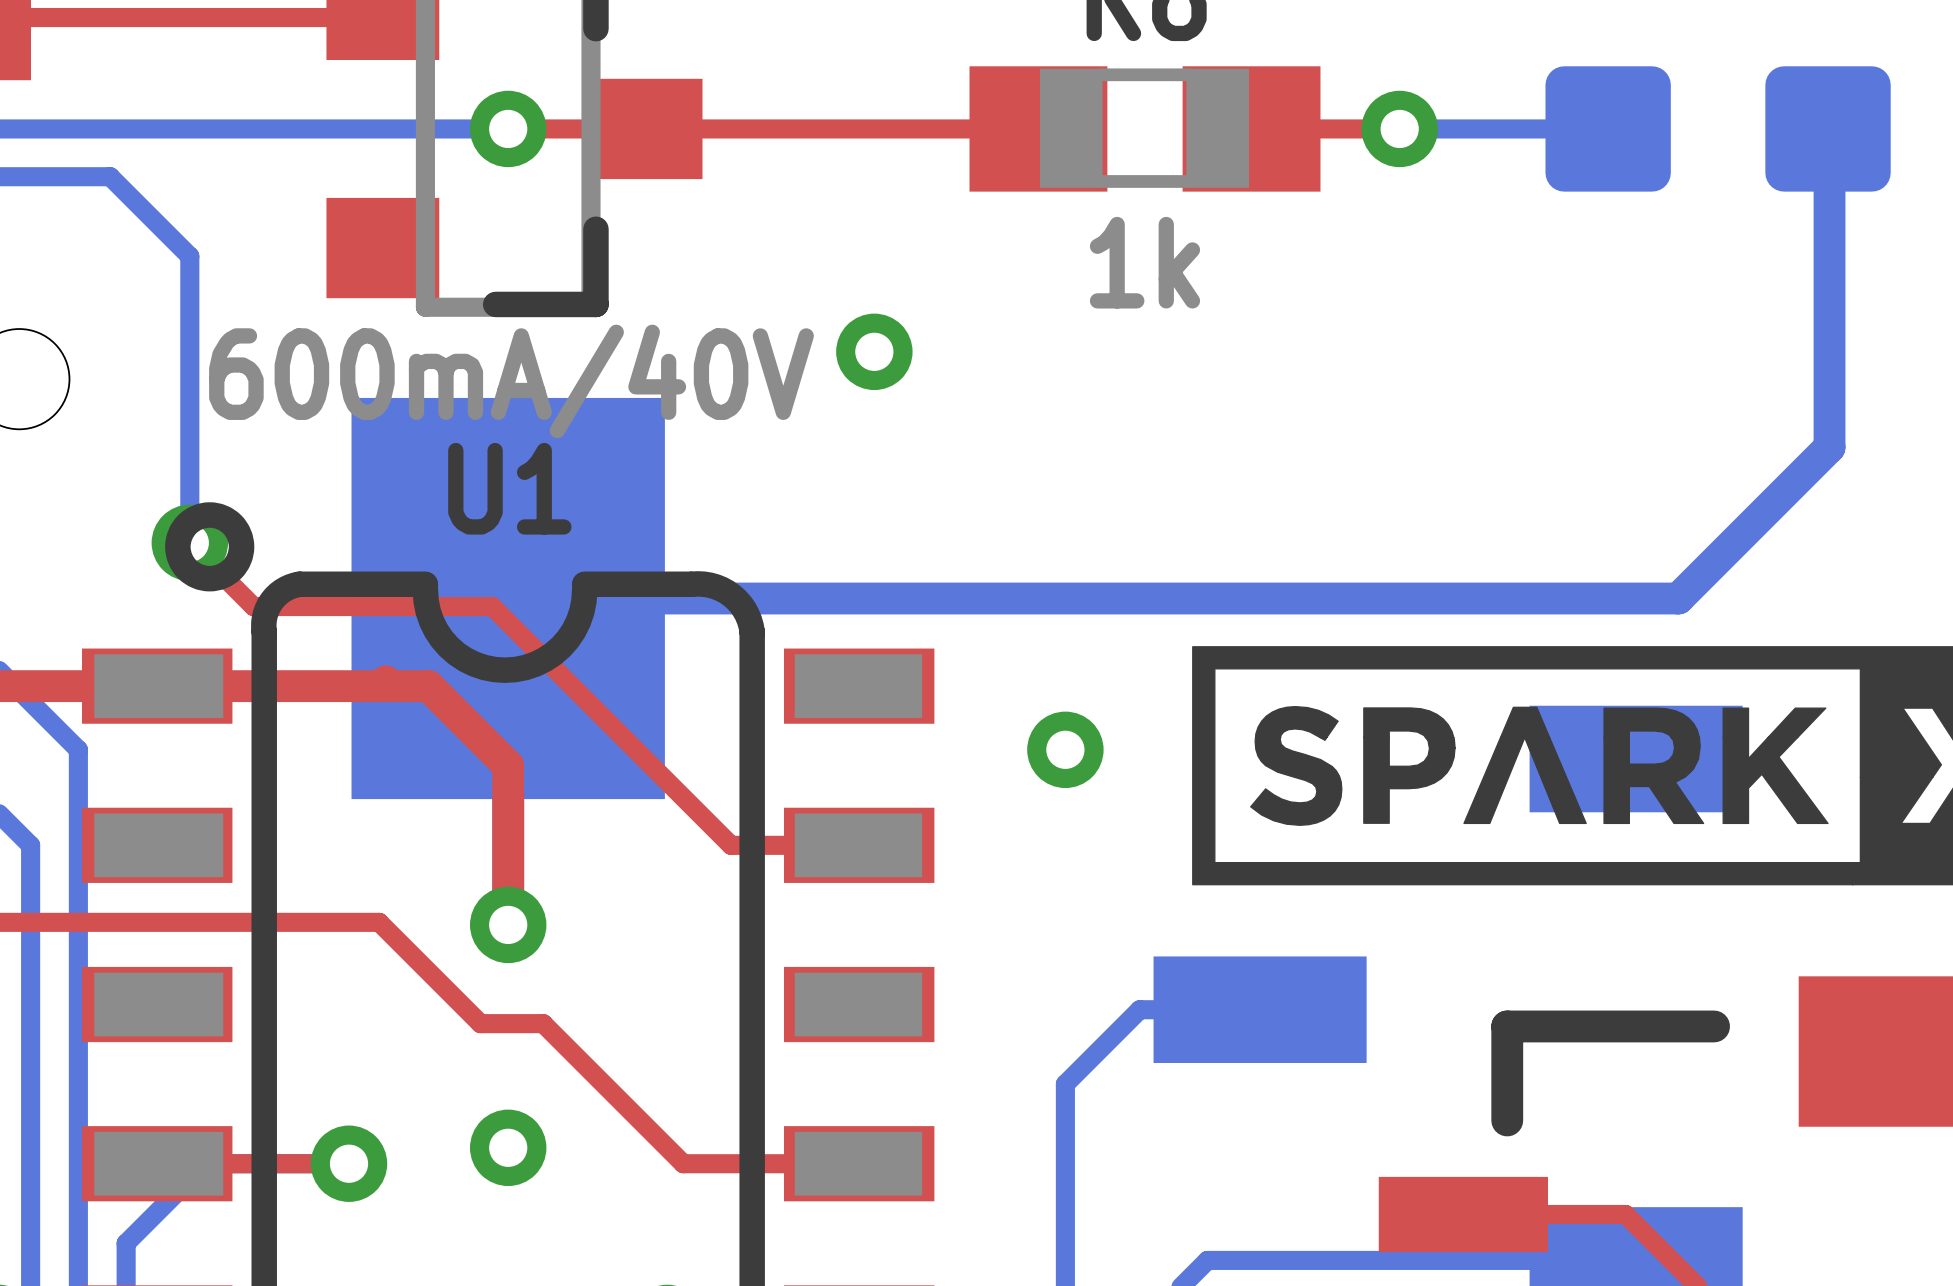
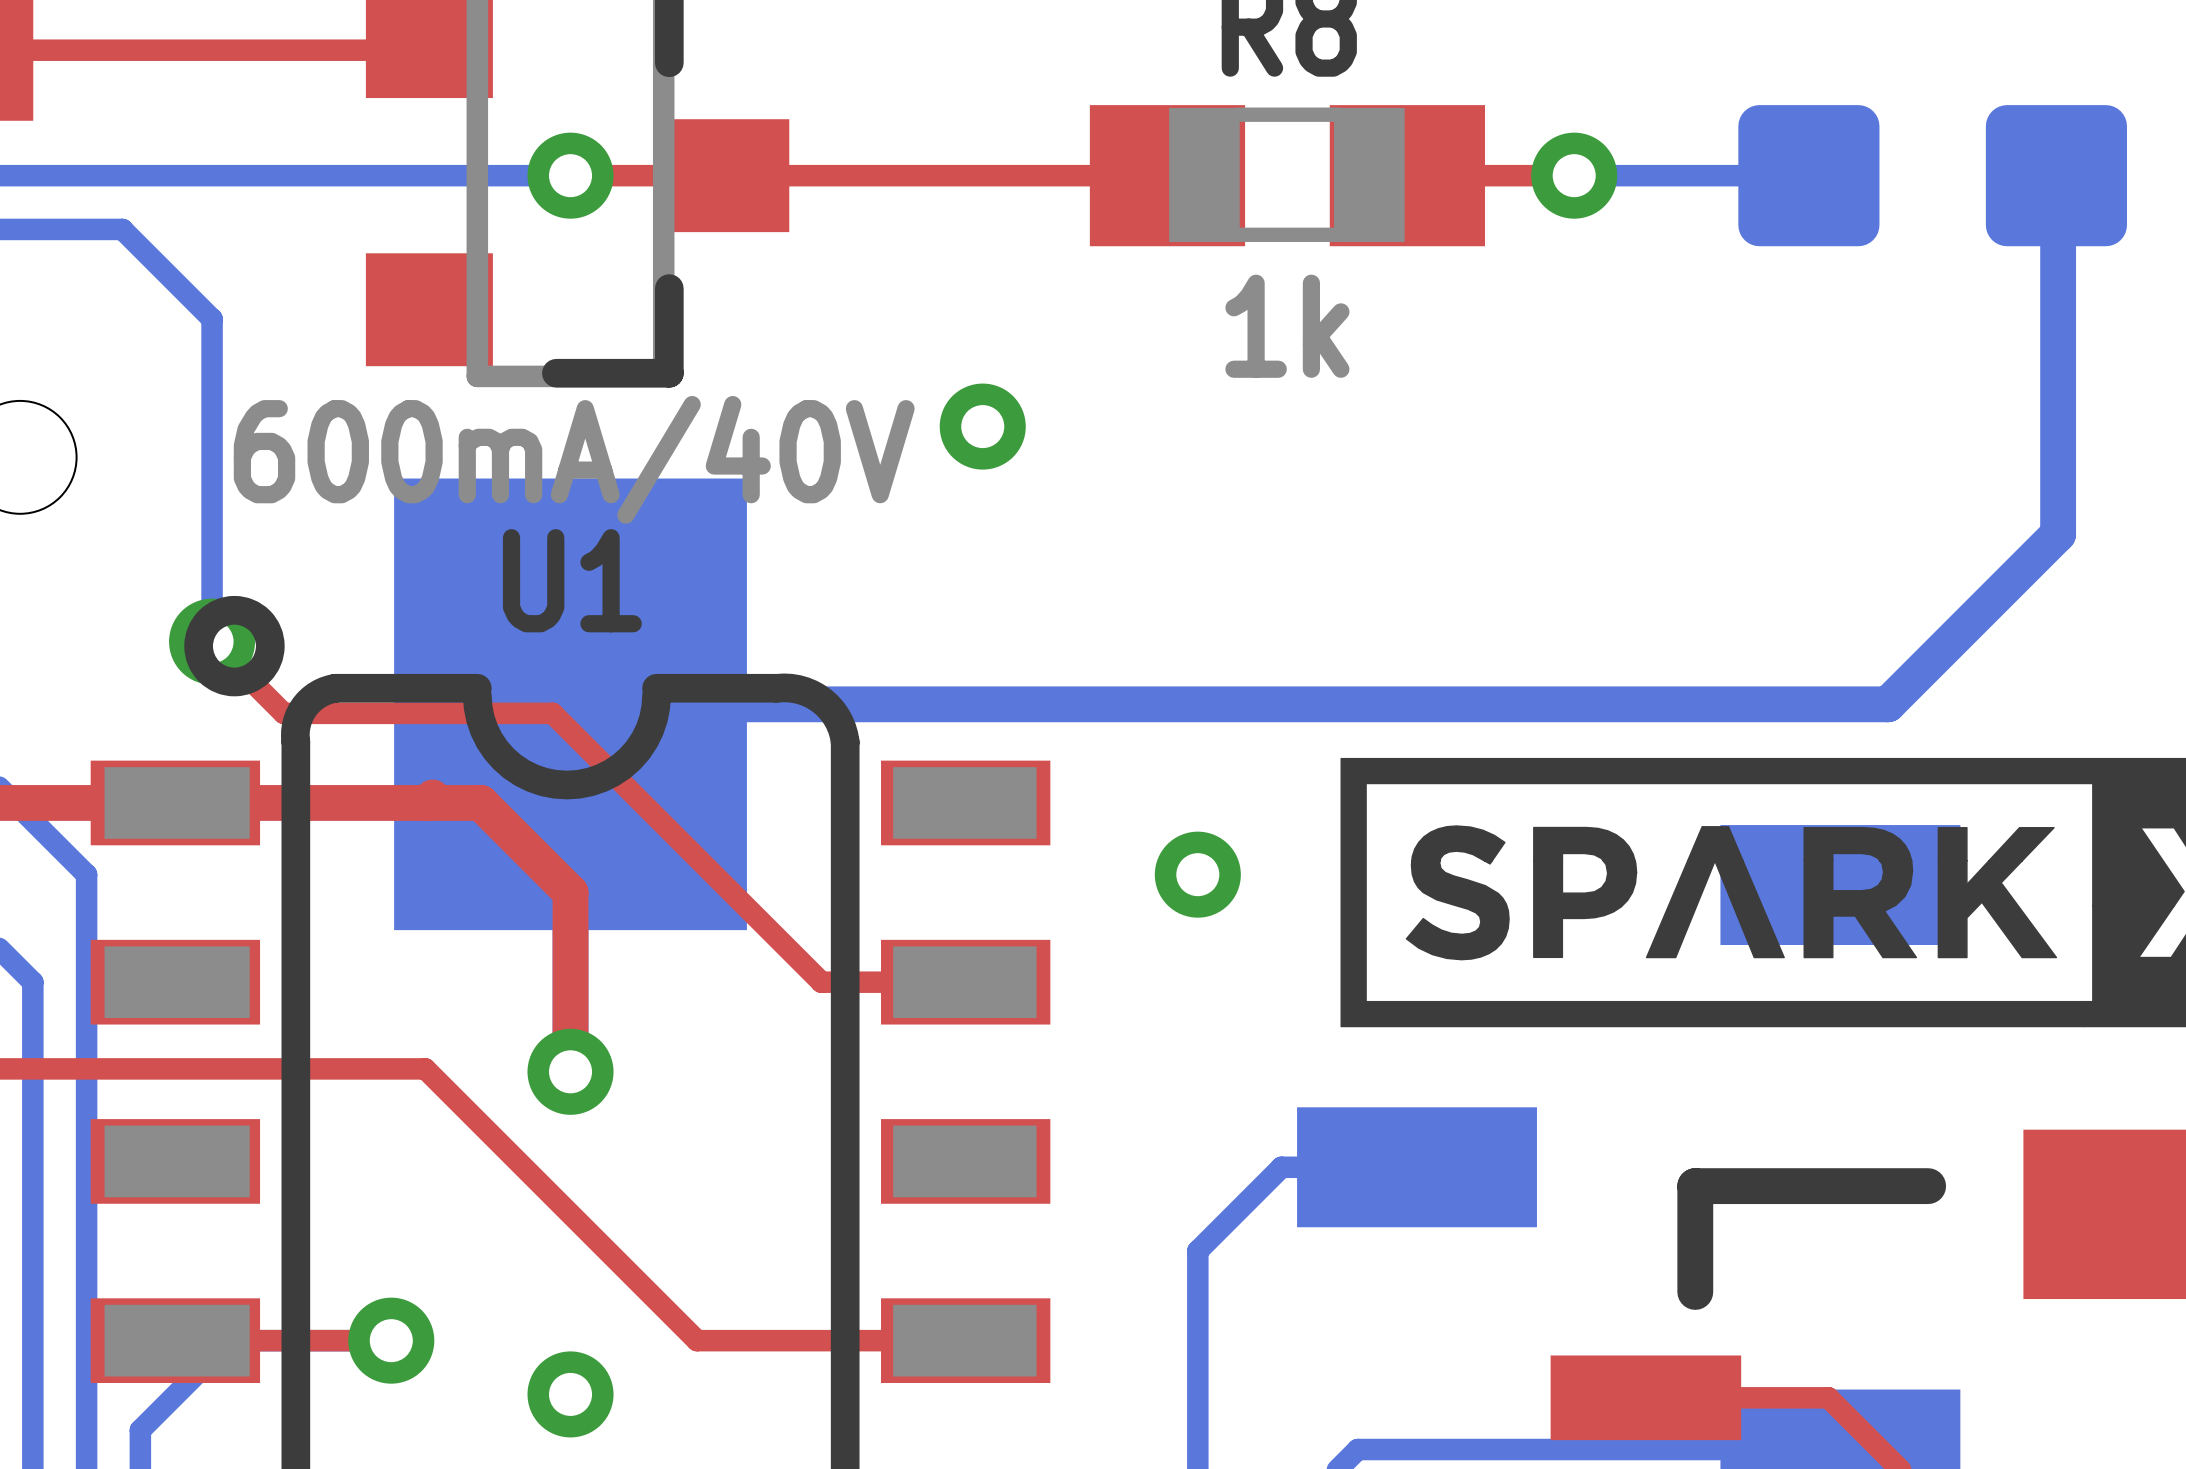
top track: (480, 1023) (543, 1023) (683, 1163) -> (539, 1182) (697, 1340) (767, 1340)
via position: (508, 1147) -> (570, 1394)

